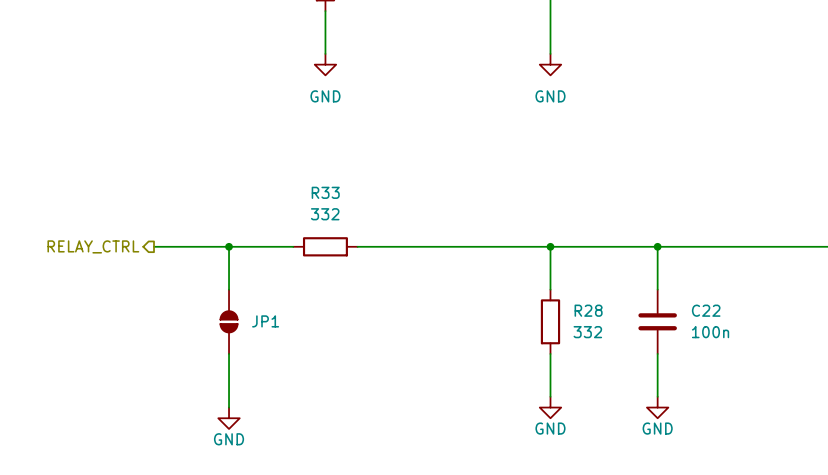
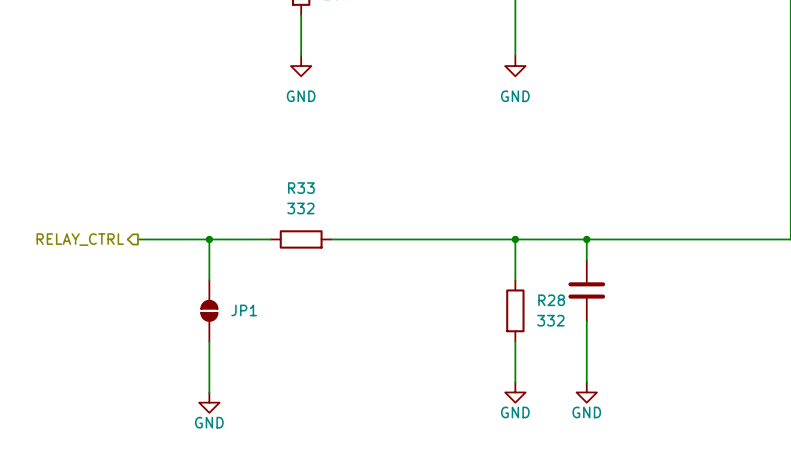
wire: none -> (586, 239) (586, 259)
wire: (657, 246) (657, 289) -> none
junction position: (657, 246) -> (586, 239)
part: none -> (586, 290)
C22: 100n (657, 321) -> none
wire: none -> (586, 321) (586, 382)
wire: (657, 353) (657, 396) -> none
power symbol position: GND (657, 407) -> GND (586, 392)

